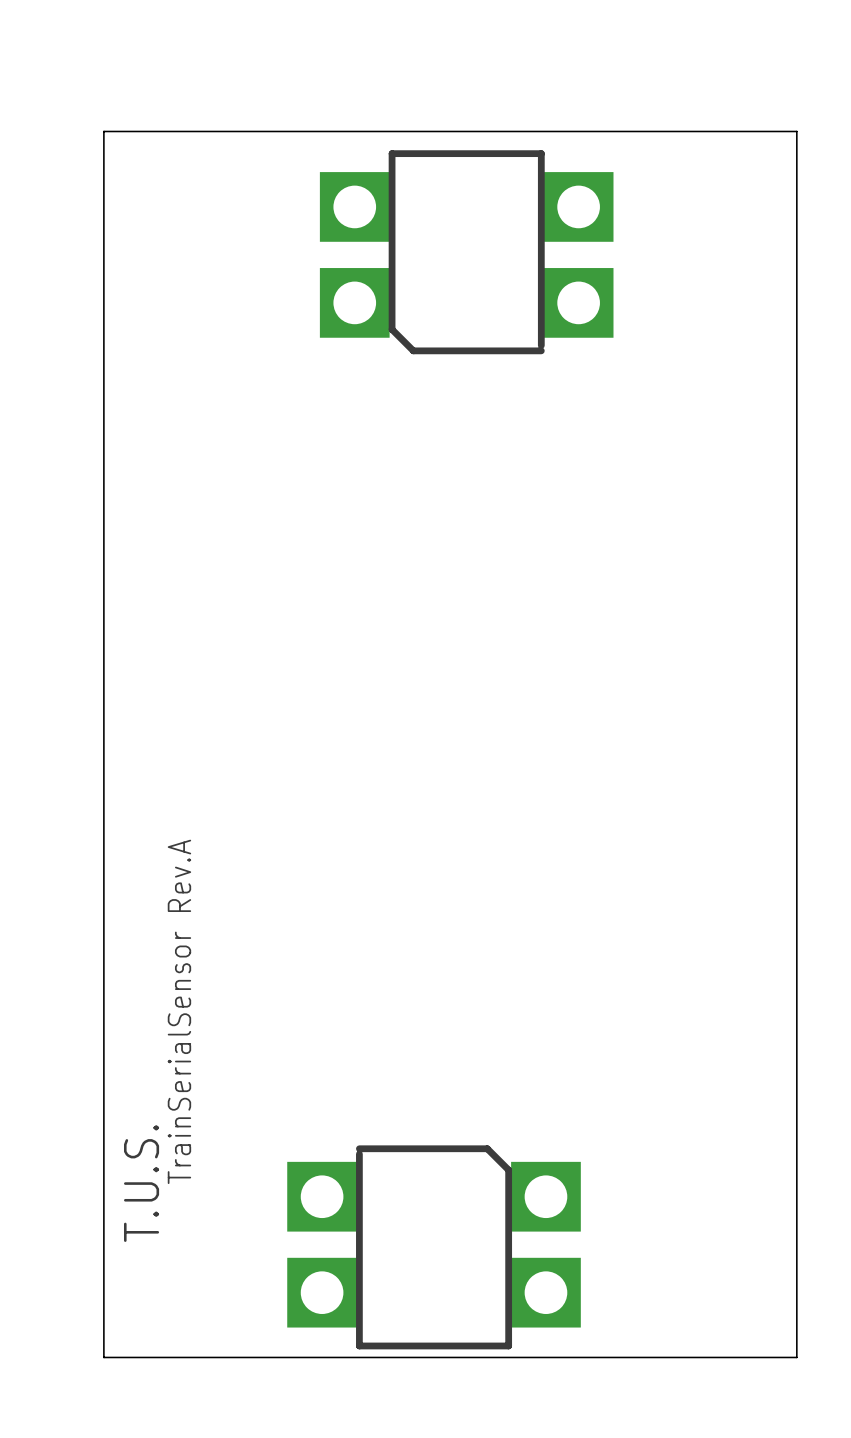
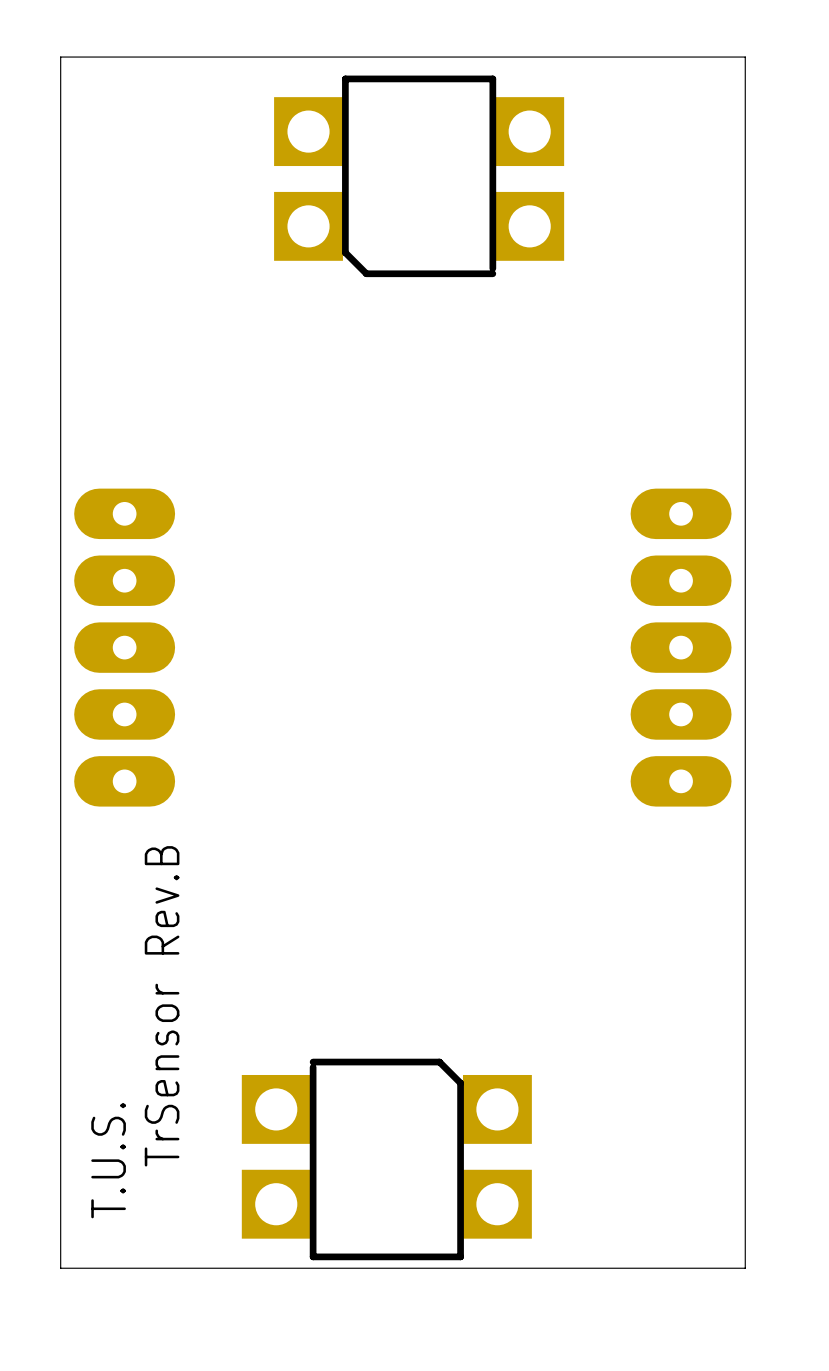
part: none -> (124, 647)
part: none -> (681, 647)
text: TrainSerialSensor Rev.A (179, 1011) -> TrSensor Rev.B (162, 1006)
text position: T.U.S. (141, 1183) -> T.U.S. (108, 1160)

